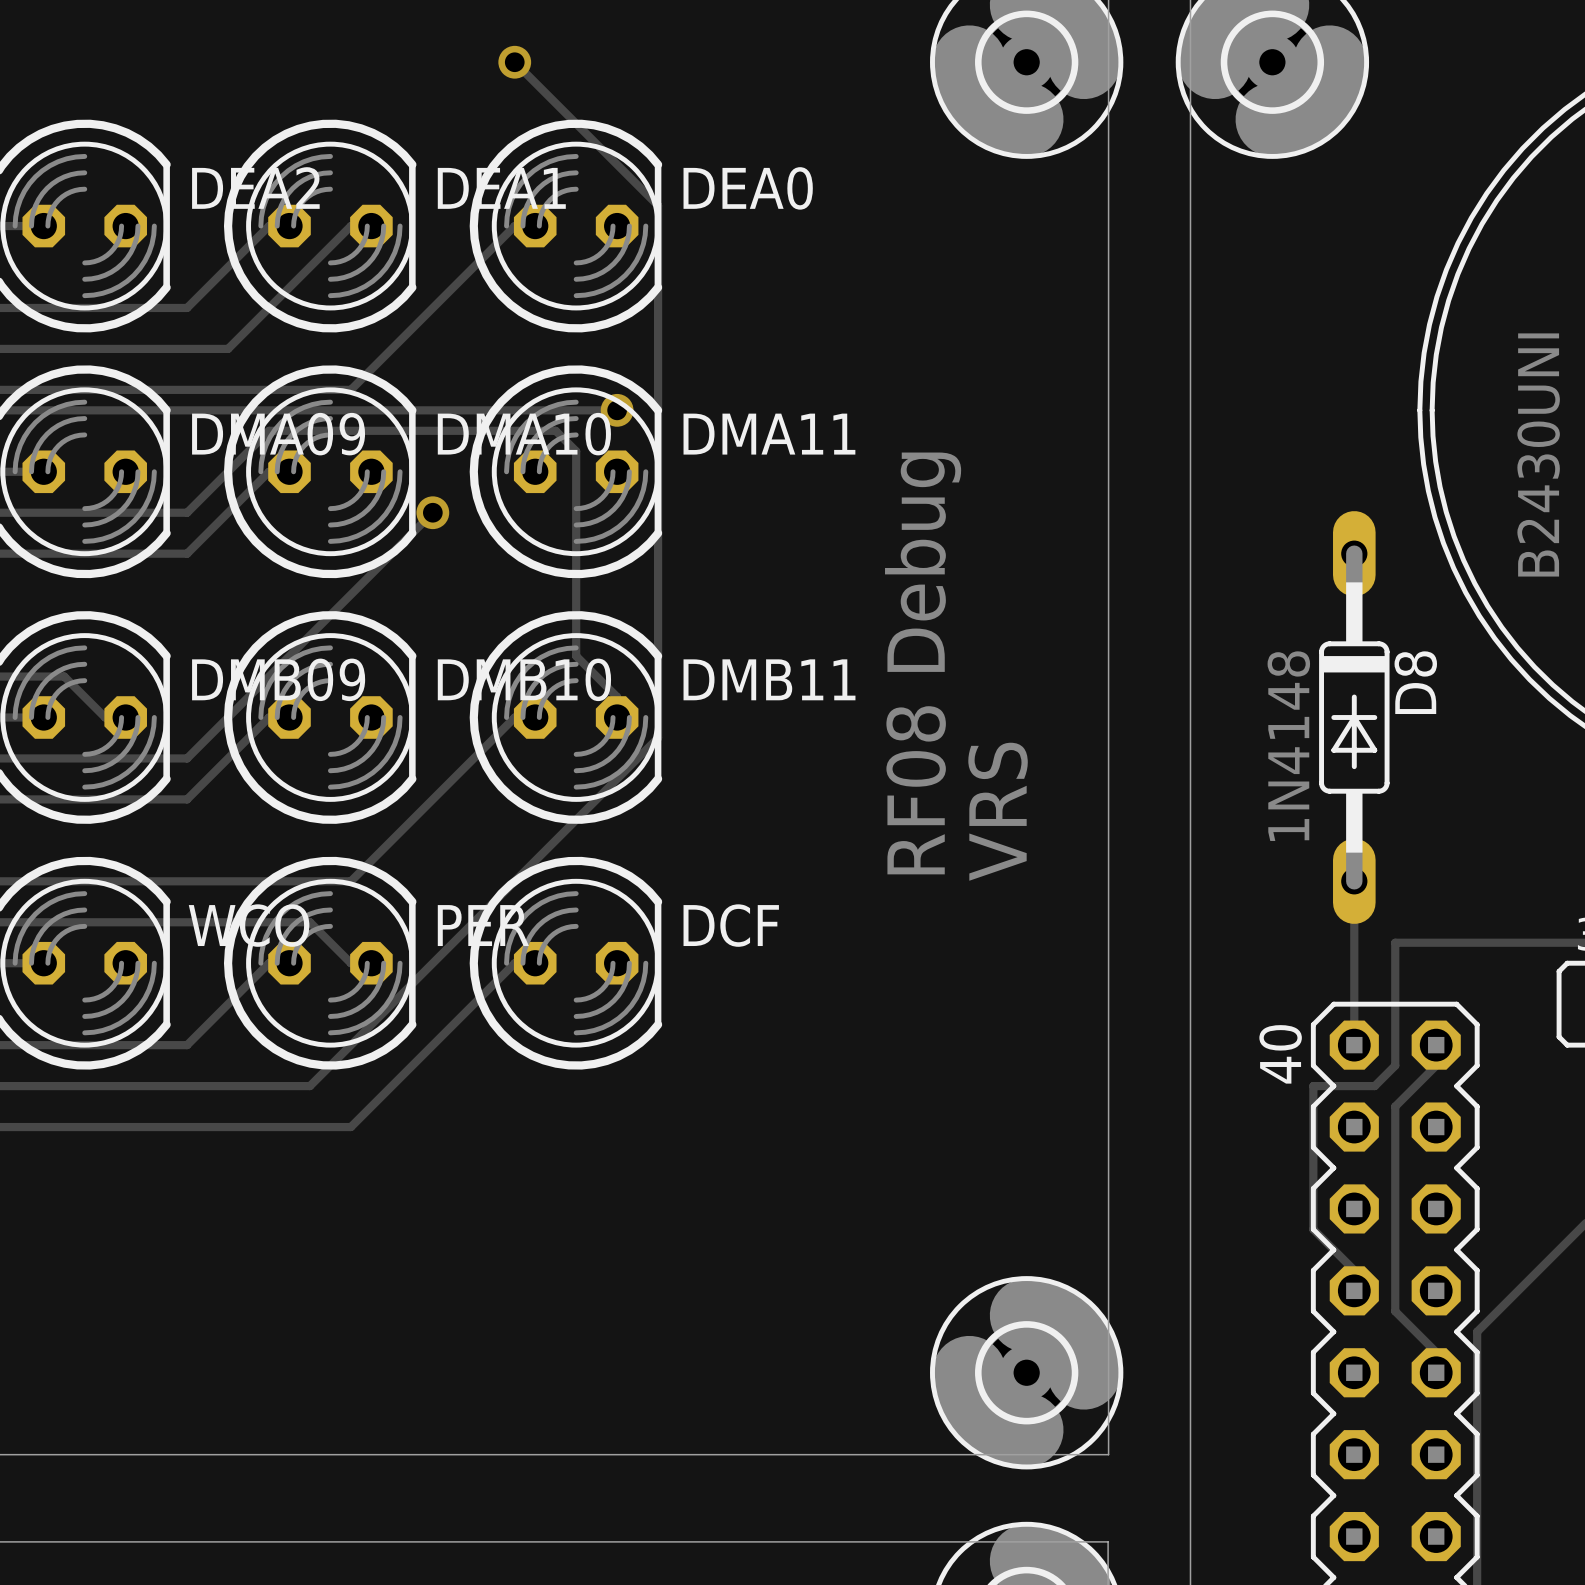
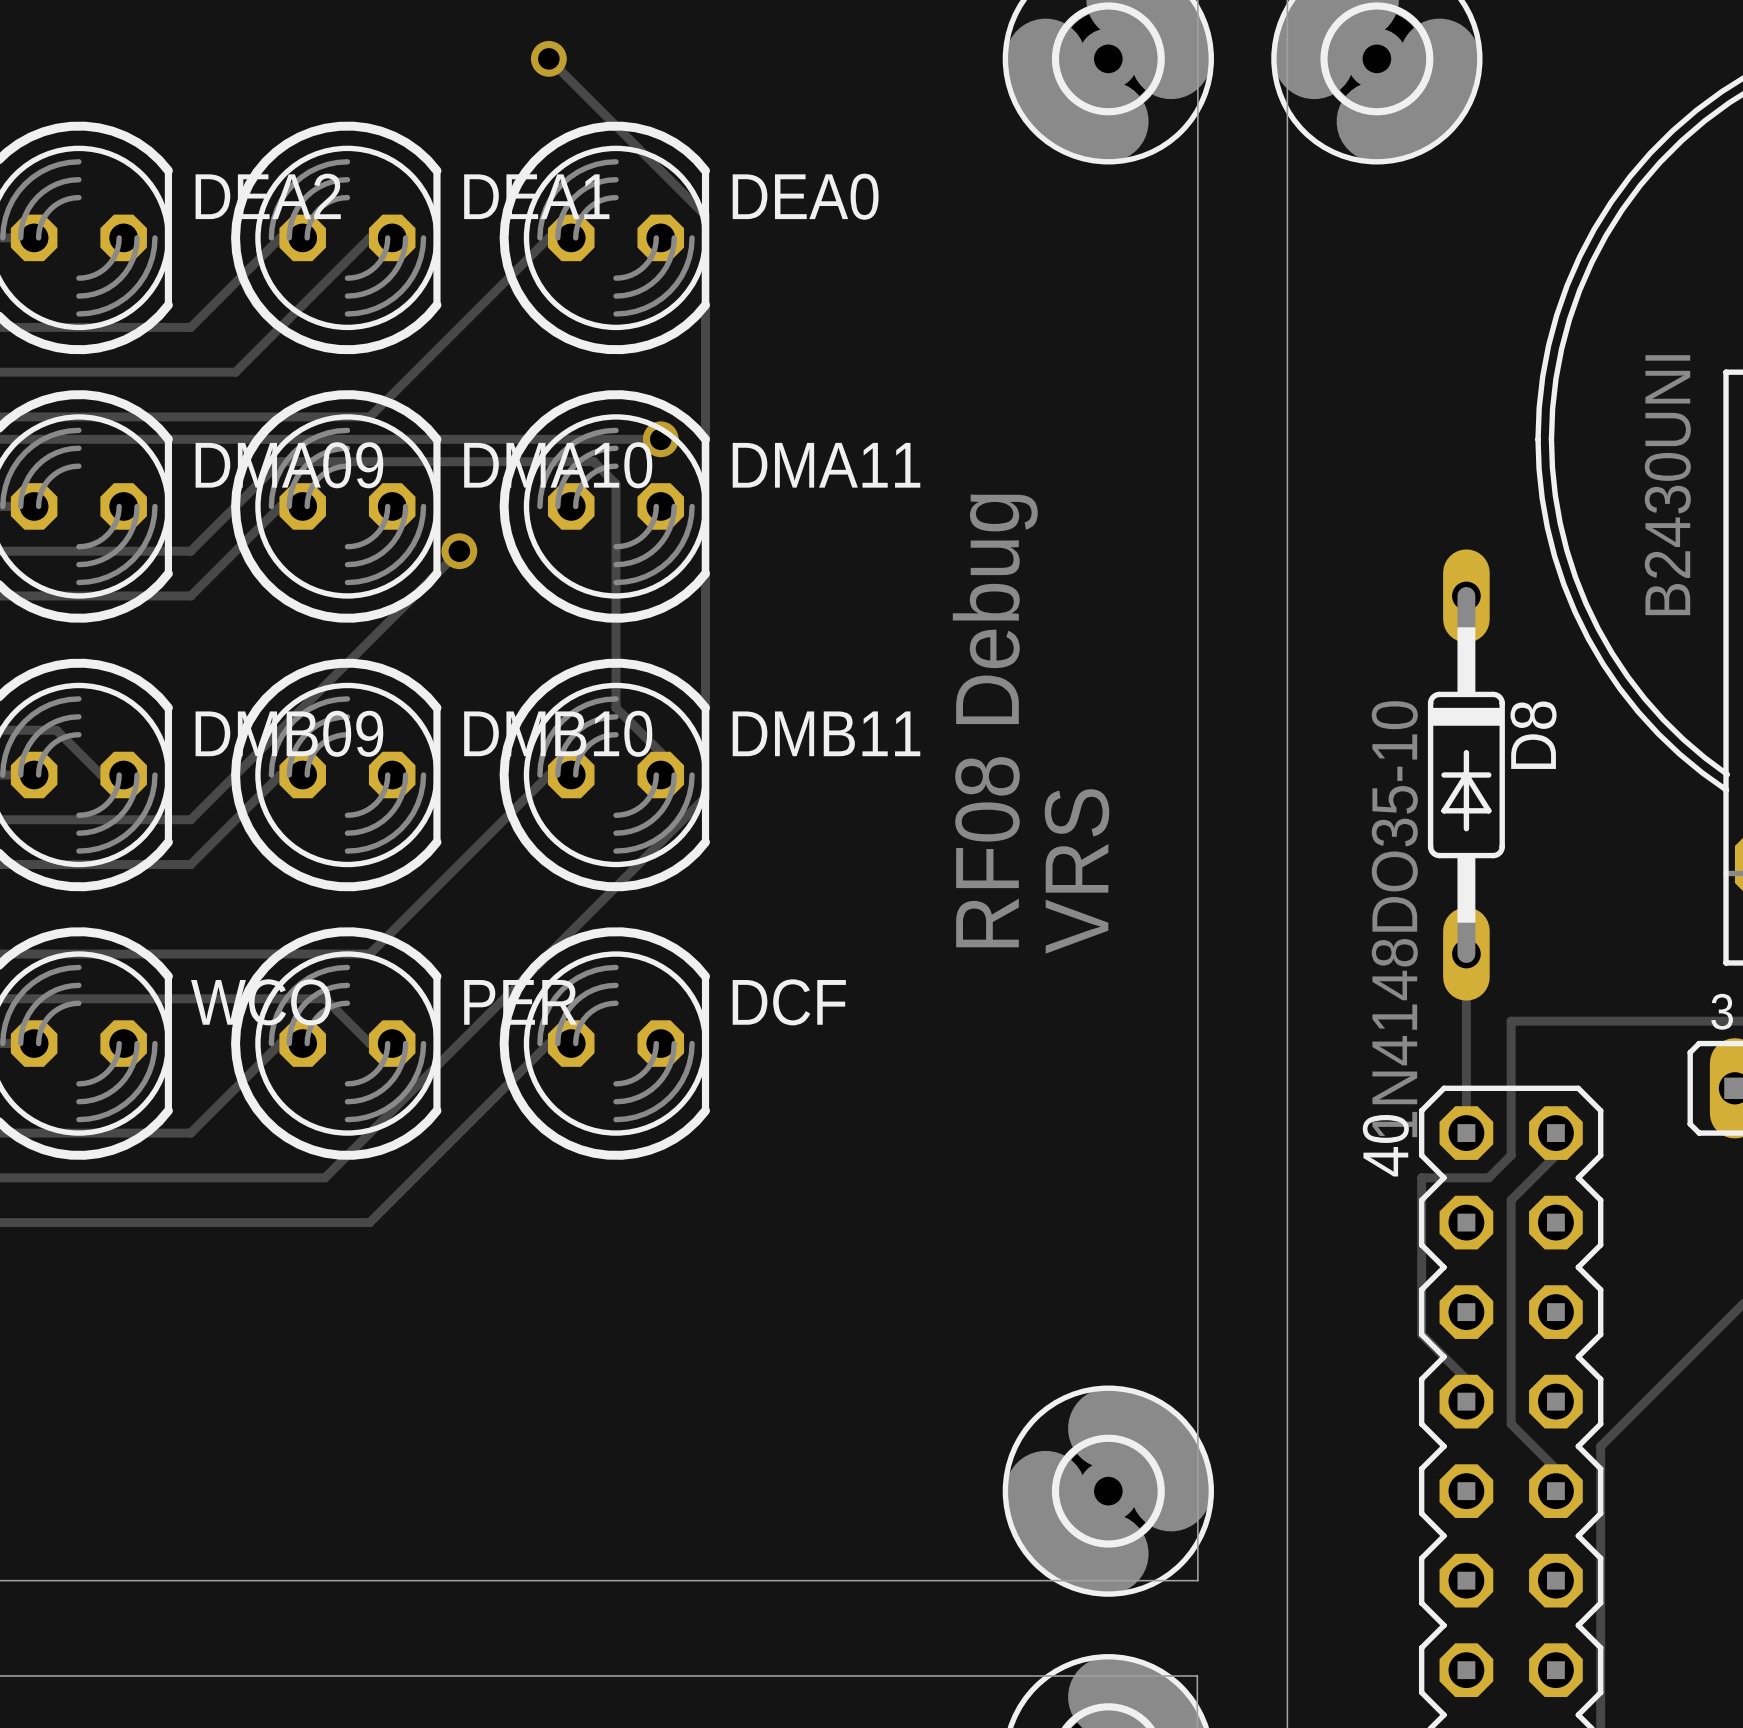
D8 value: 1N4148 (1288, 746) -> 1N4148DO35-10 (1394, 919)

